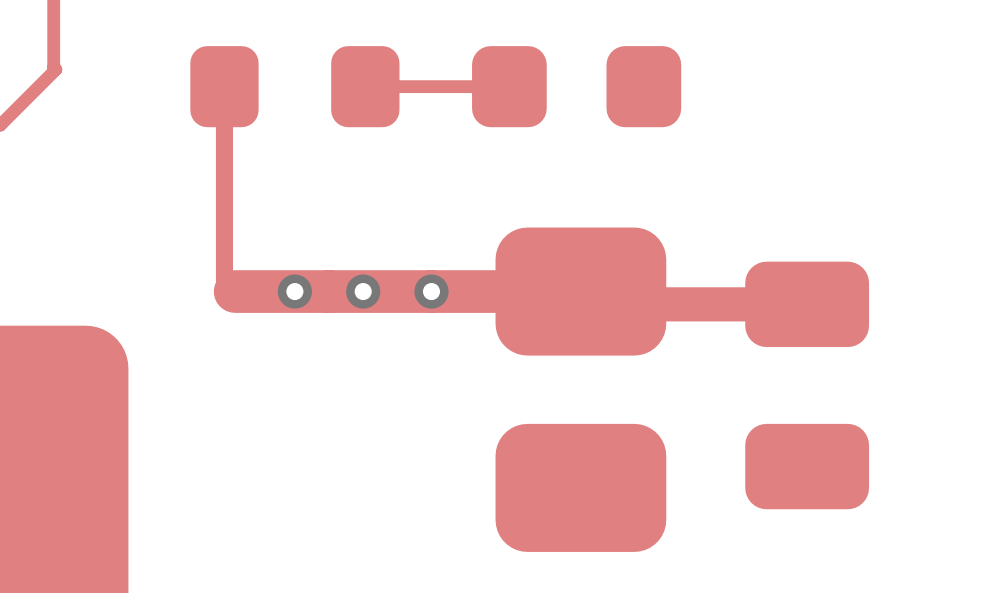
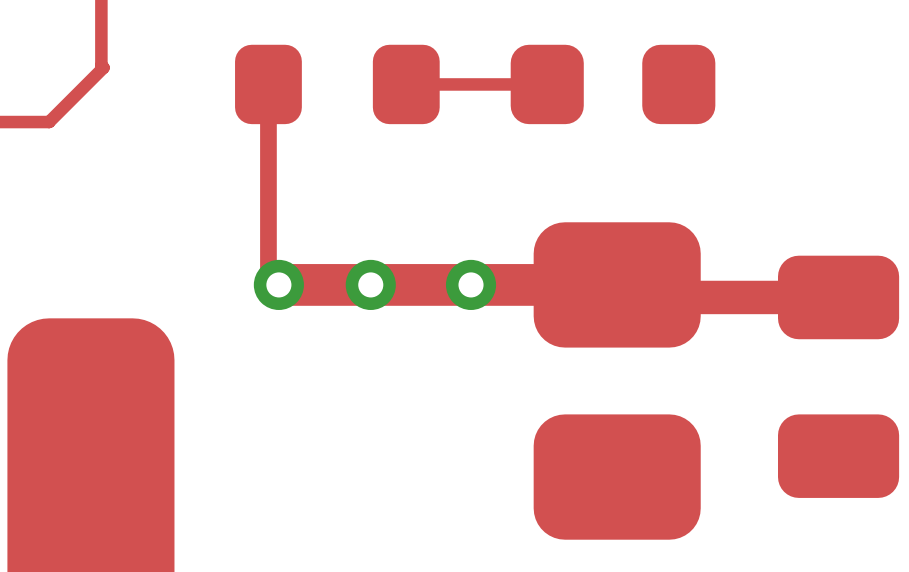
via size: [414, 274, 449, 309] -> [445, 259, 497, 310]
via: none -> (278, 284)
via: (294, 291) -> none
via: none -> (370, 284)
via: (363, 291) -> none

